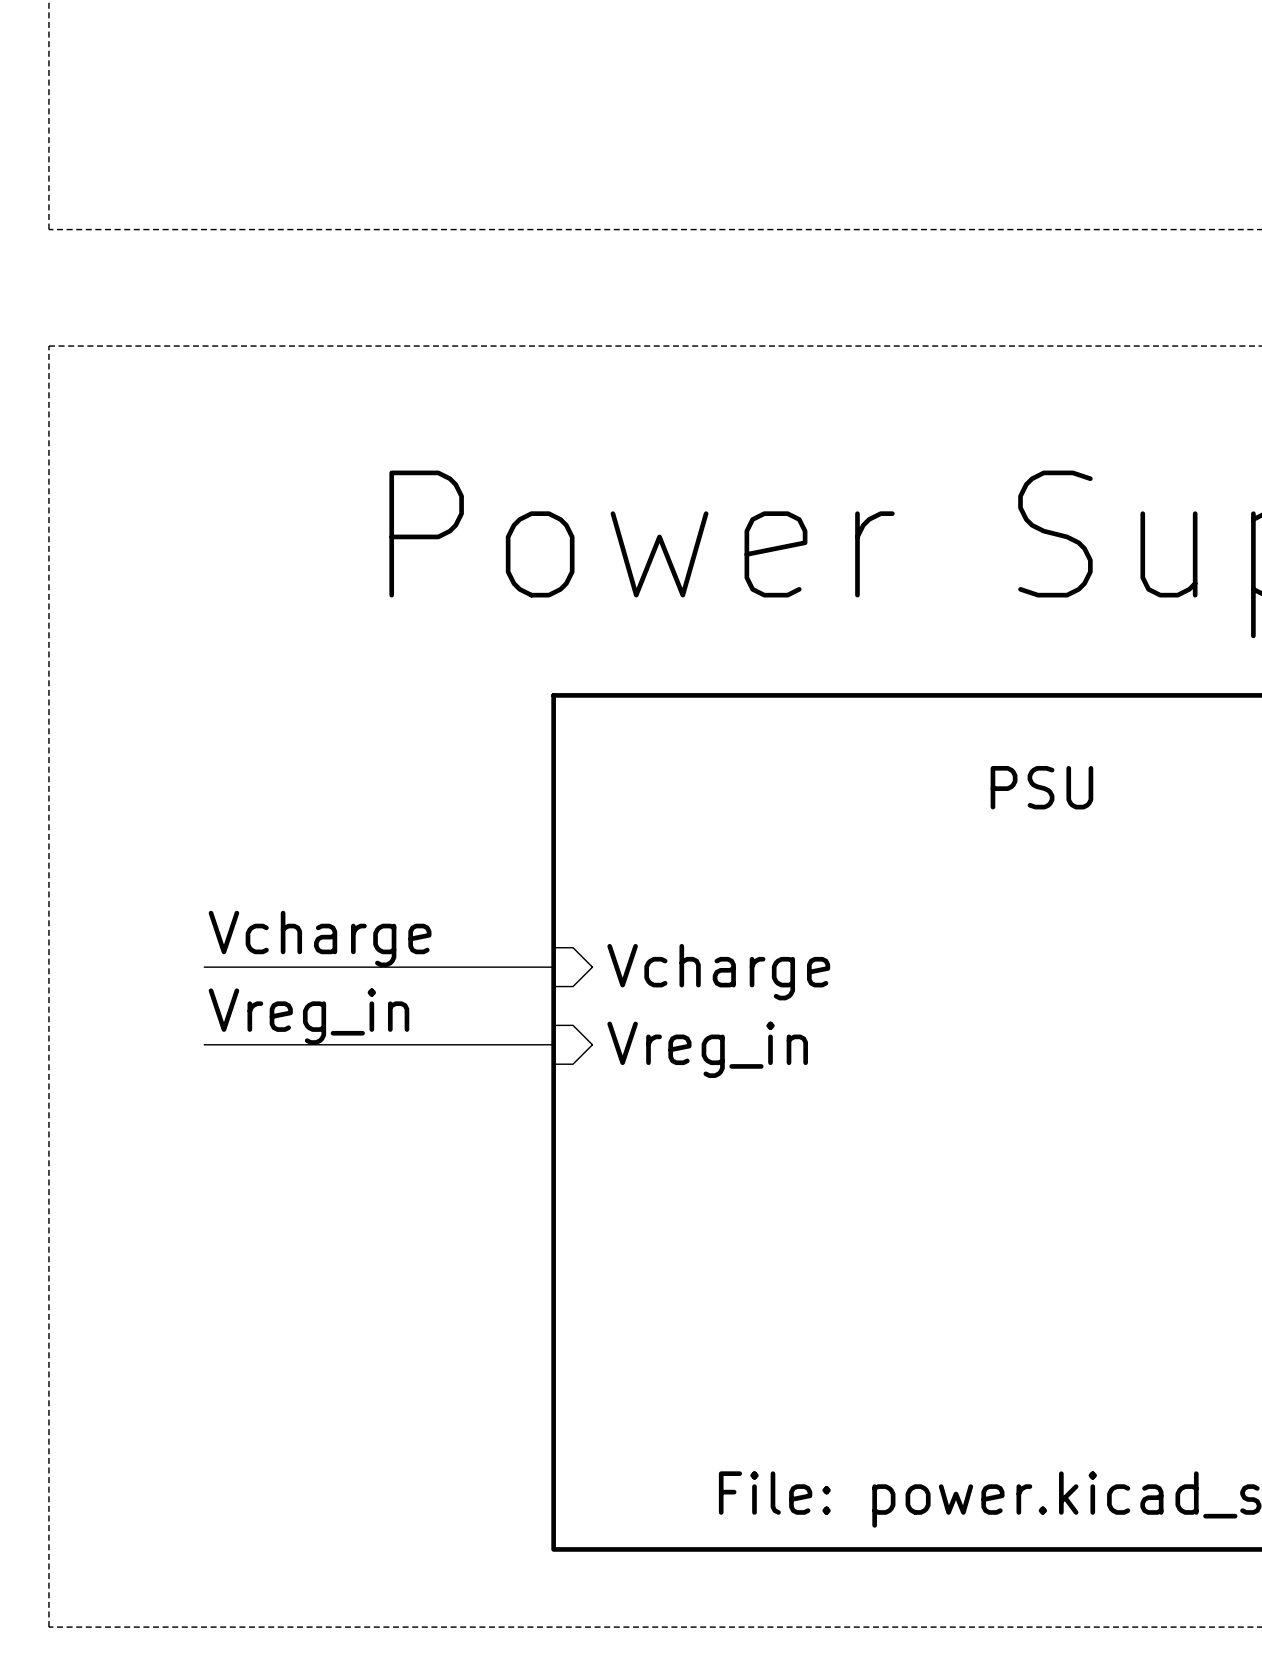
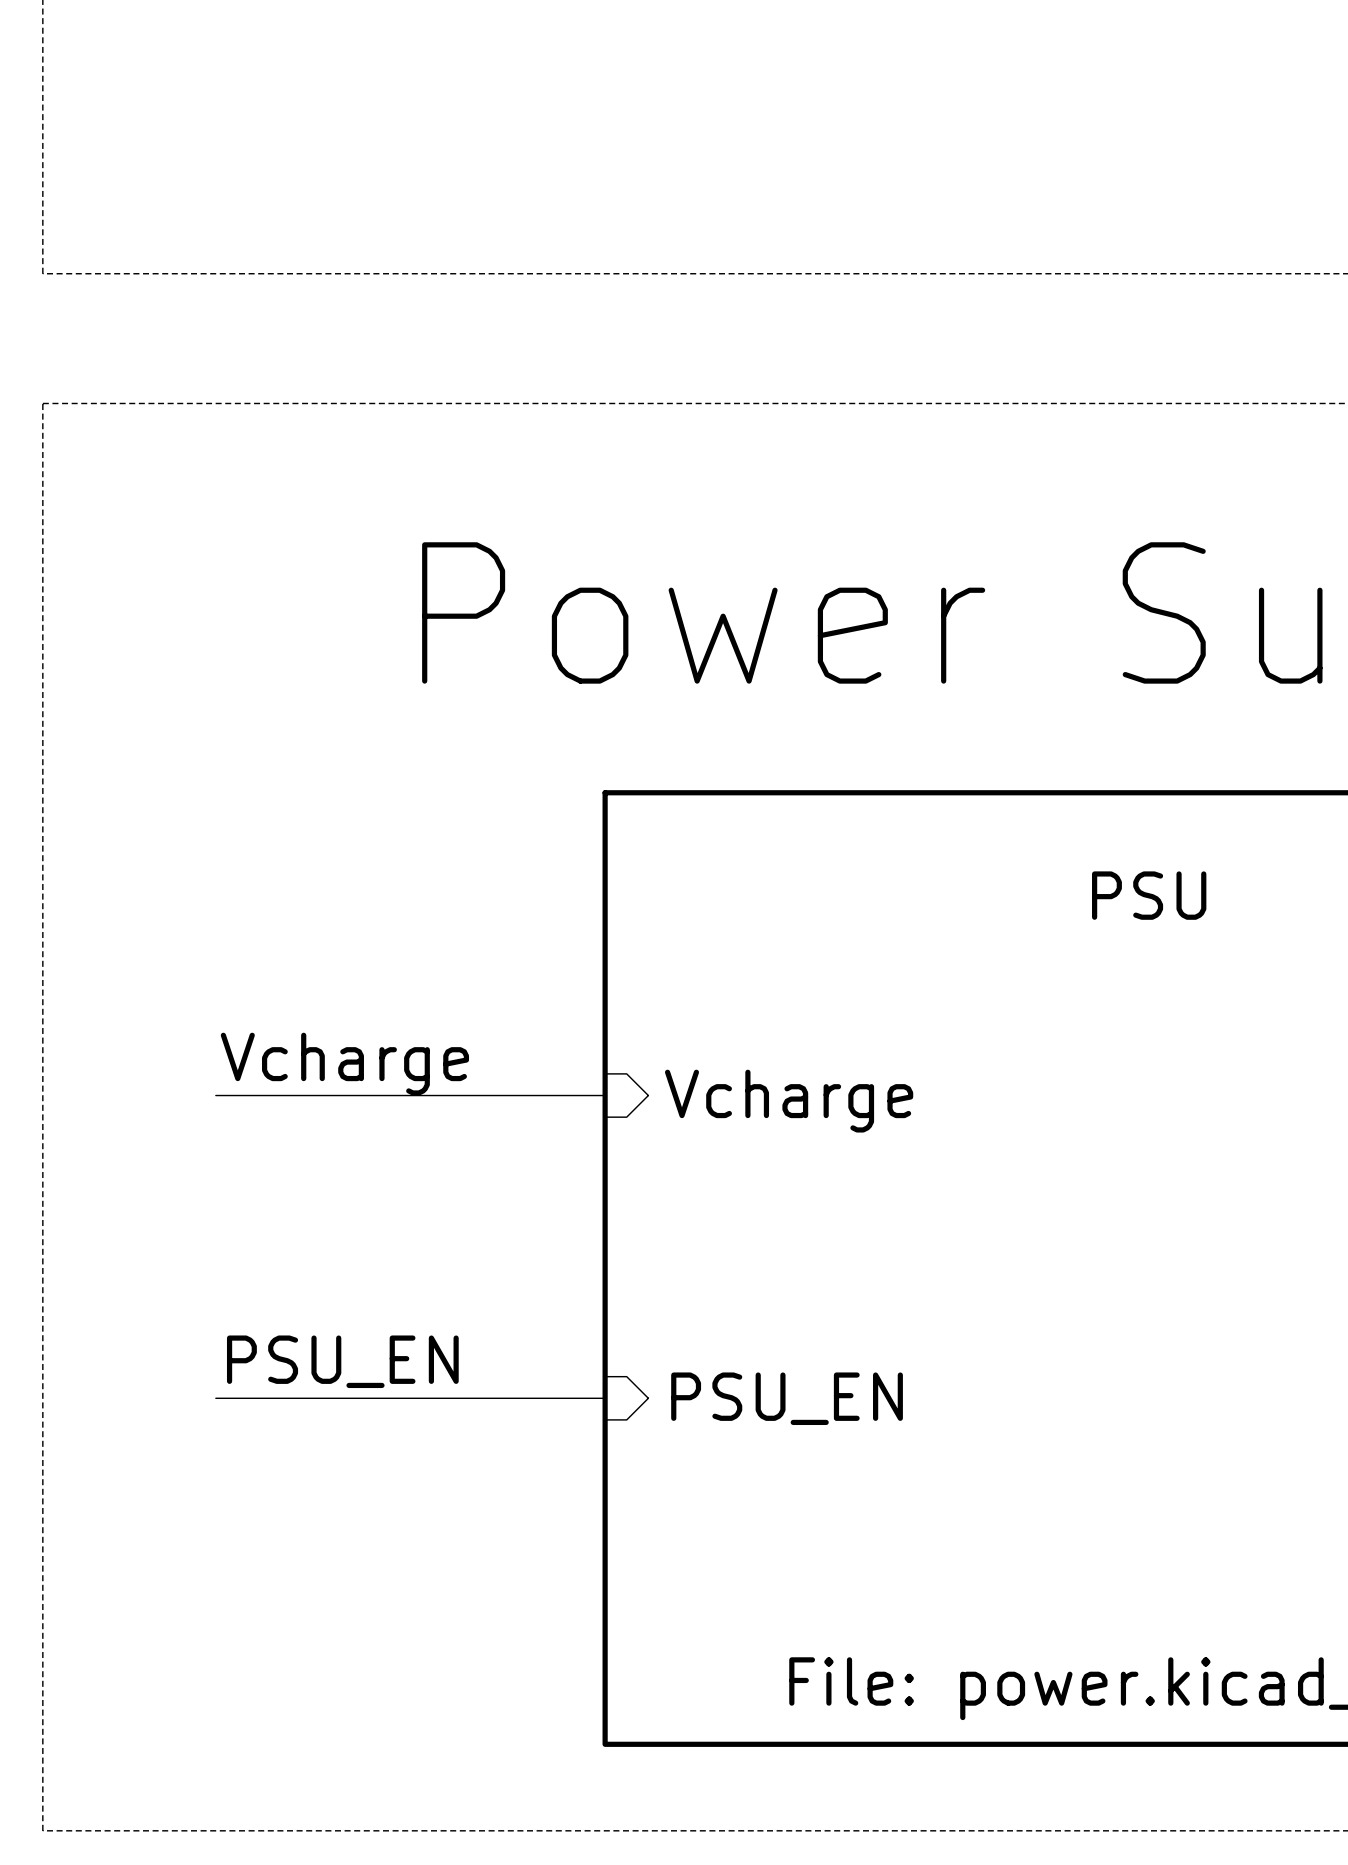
label: Vreg_in (308, 1016) -> none
wire: (204, 1044) (553, 1044) -> (215, 1398) (605, 1398)
sheet pin: Vreg_in (707, 1049) -> none
label: none -> PSU_EN (342, 1361)
sheet pin: none -> PSU_EN (787, 1398)

